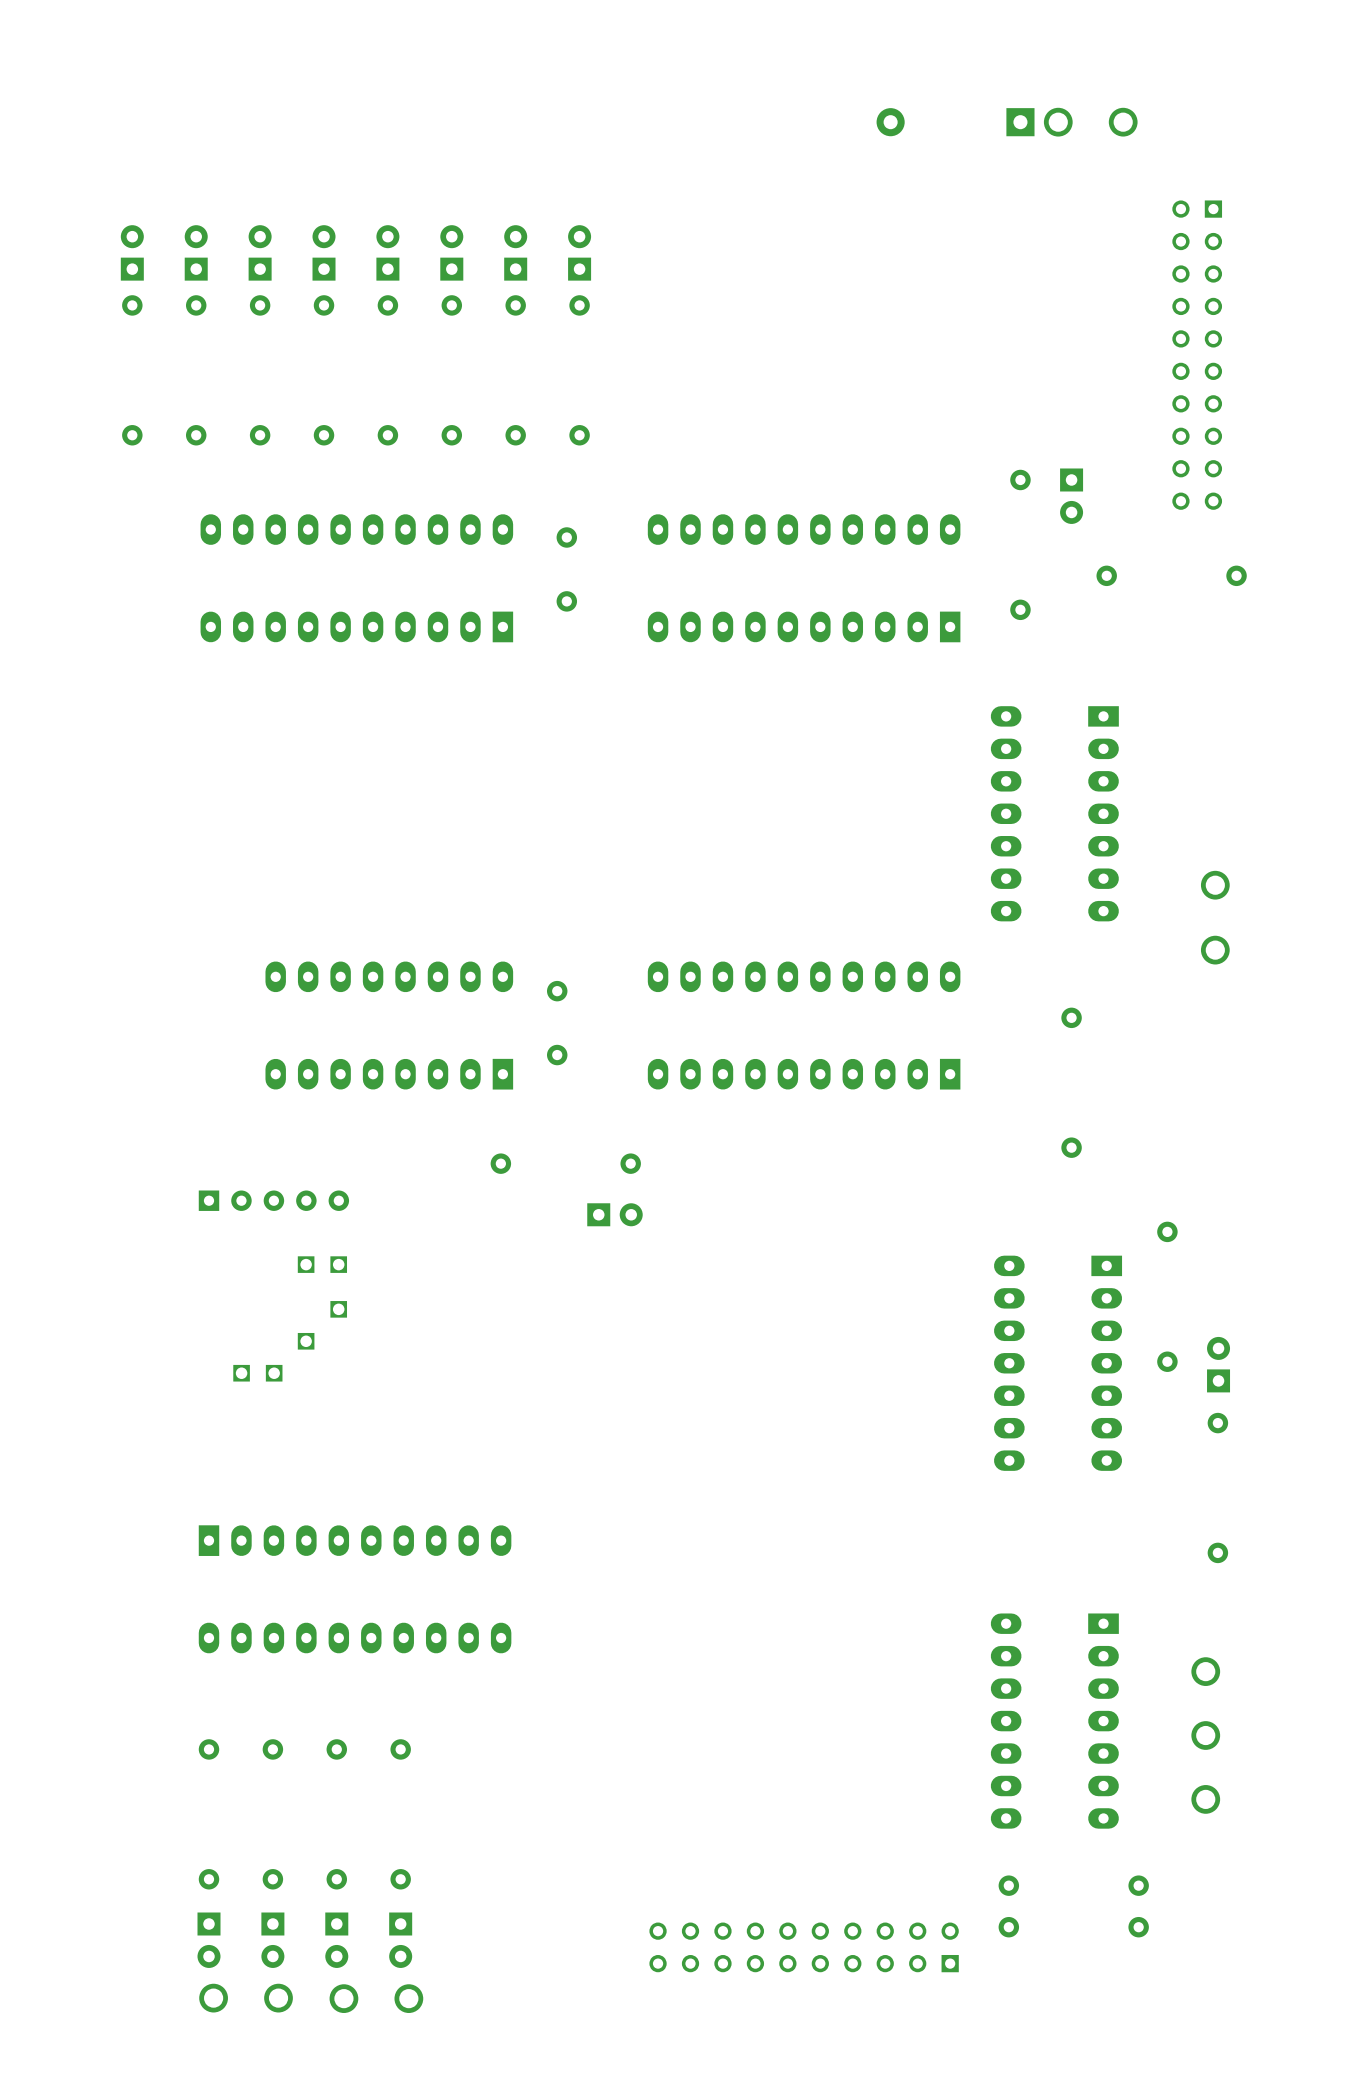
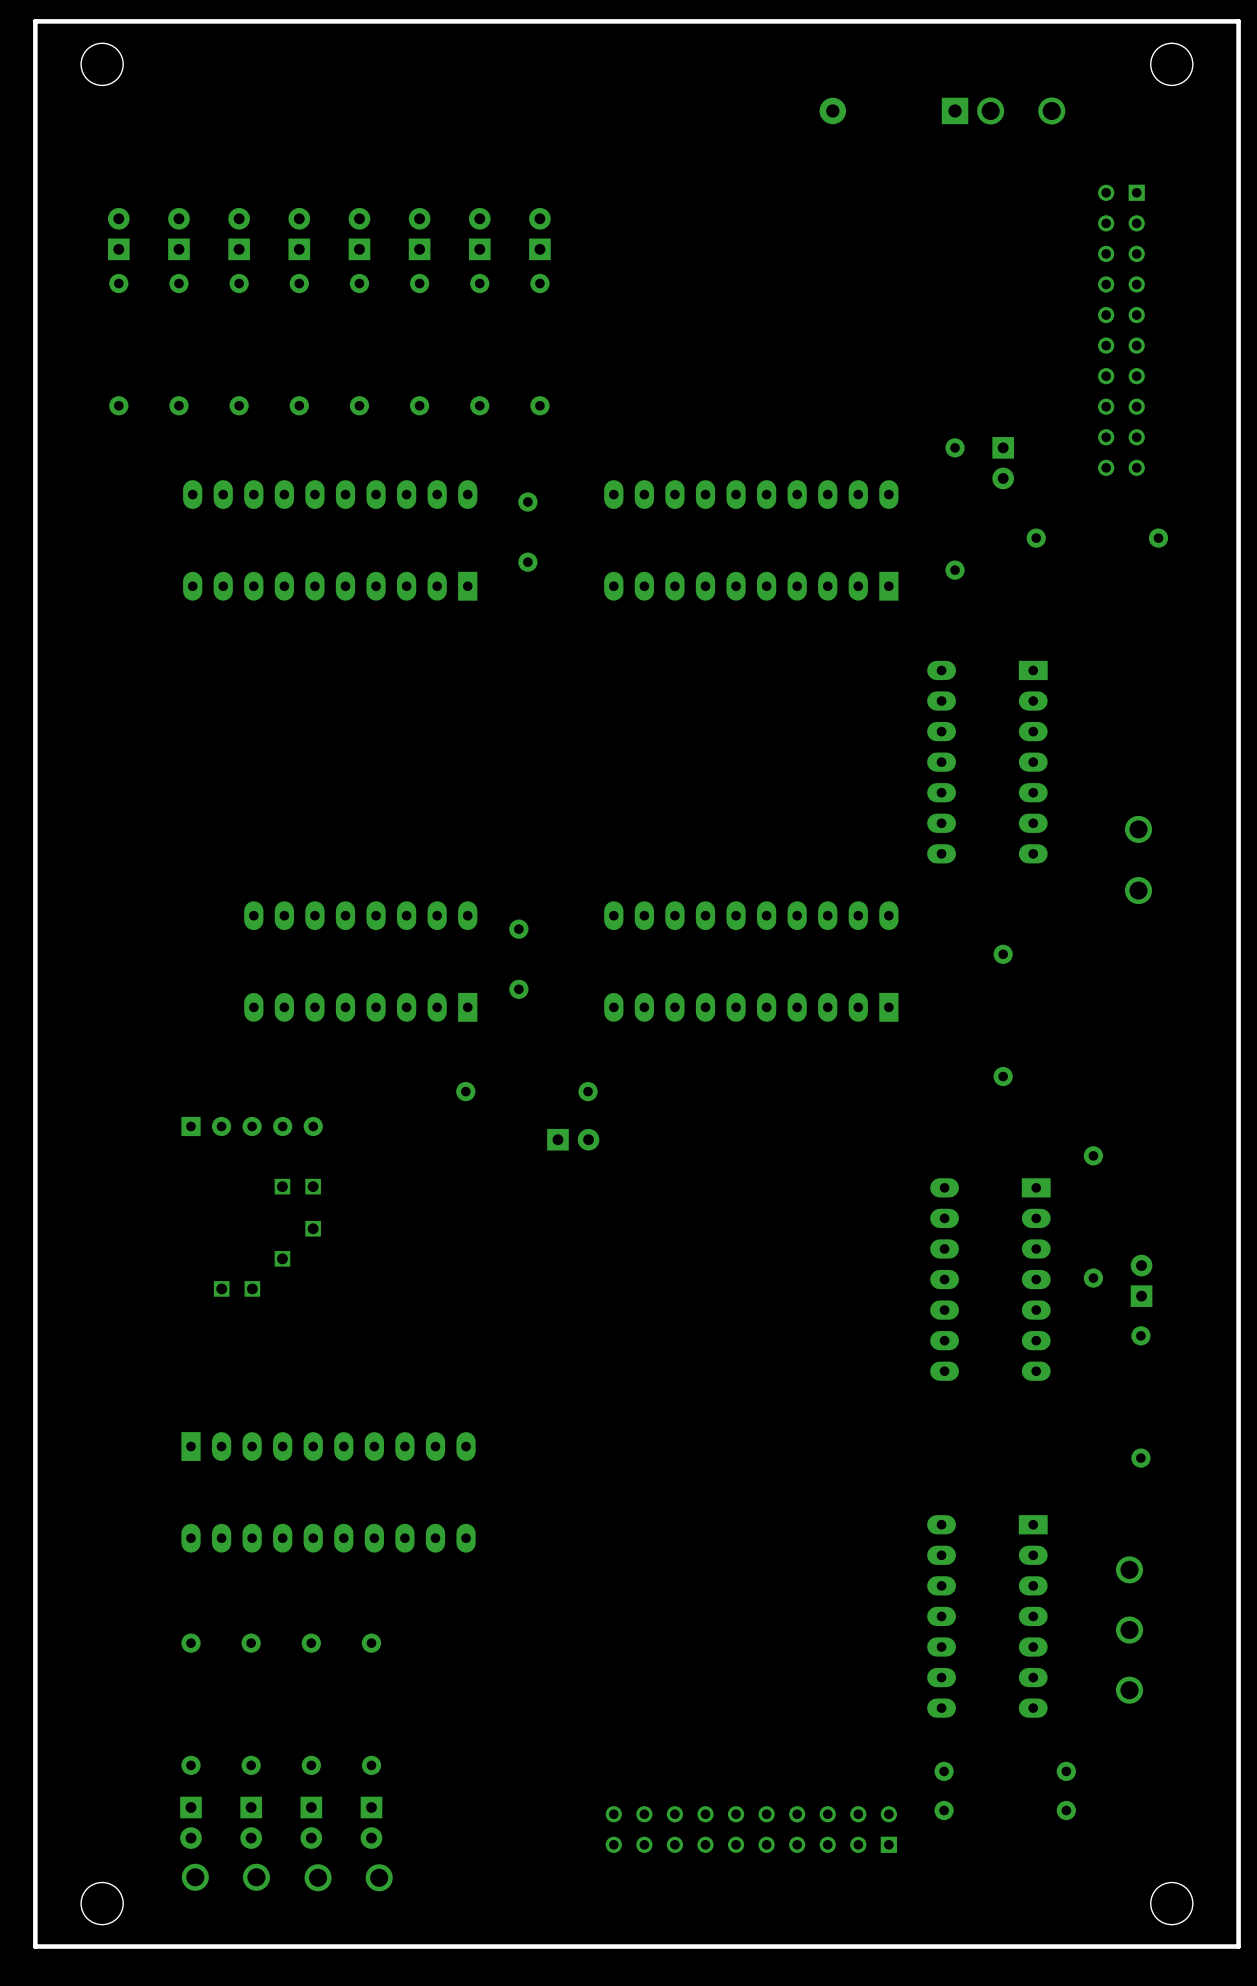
part: none -> (636, 983)

